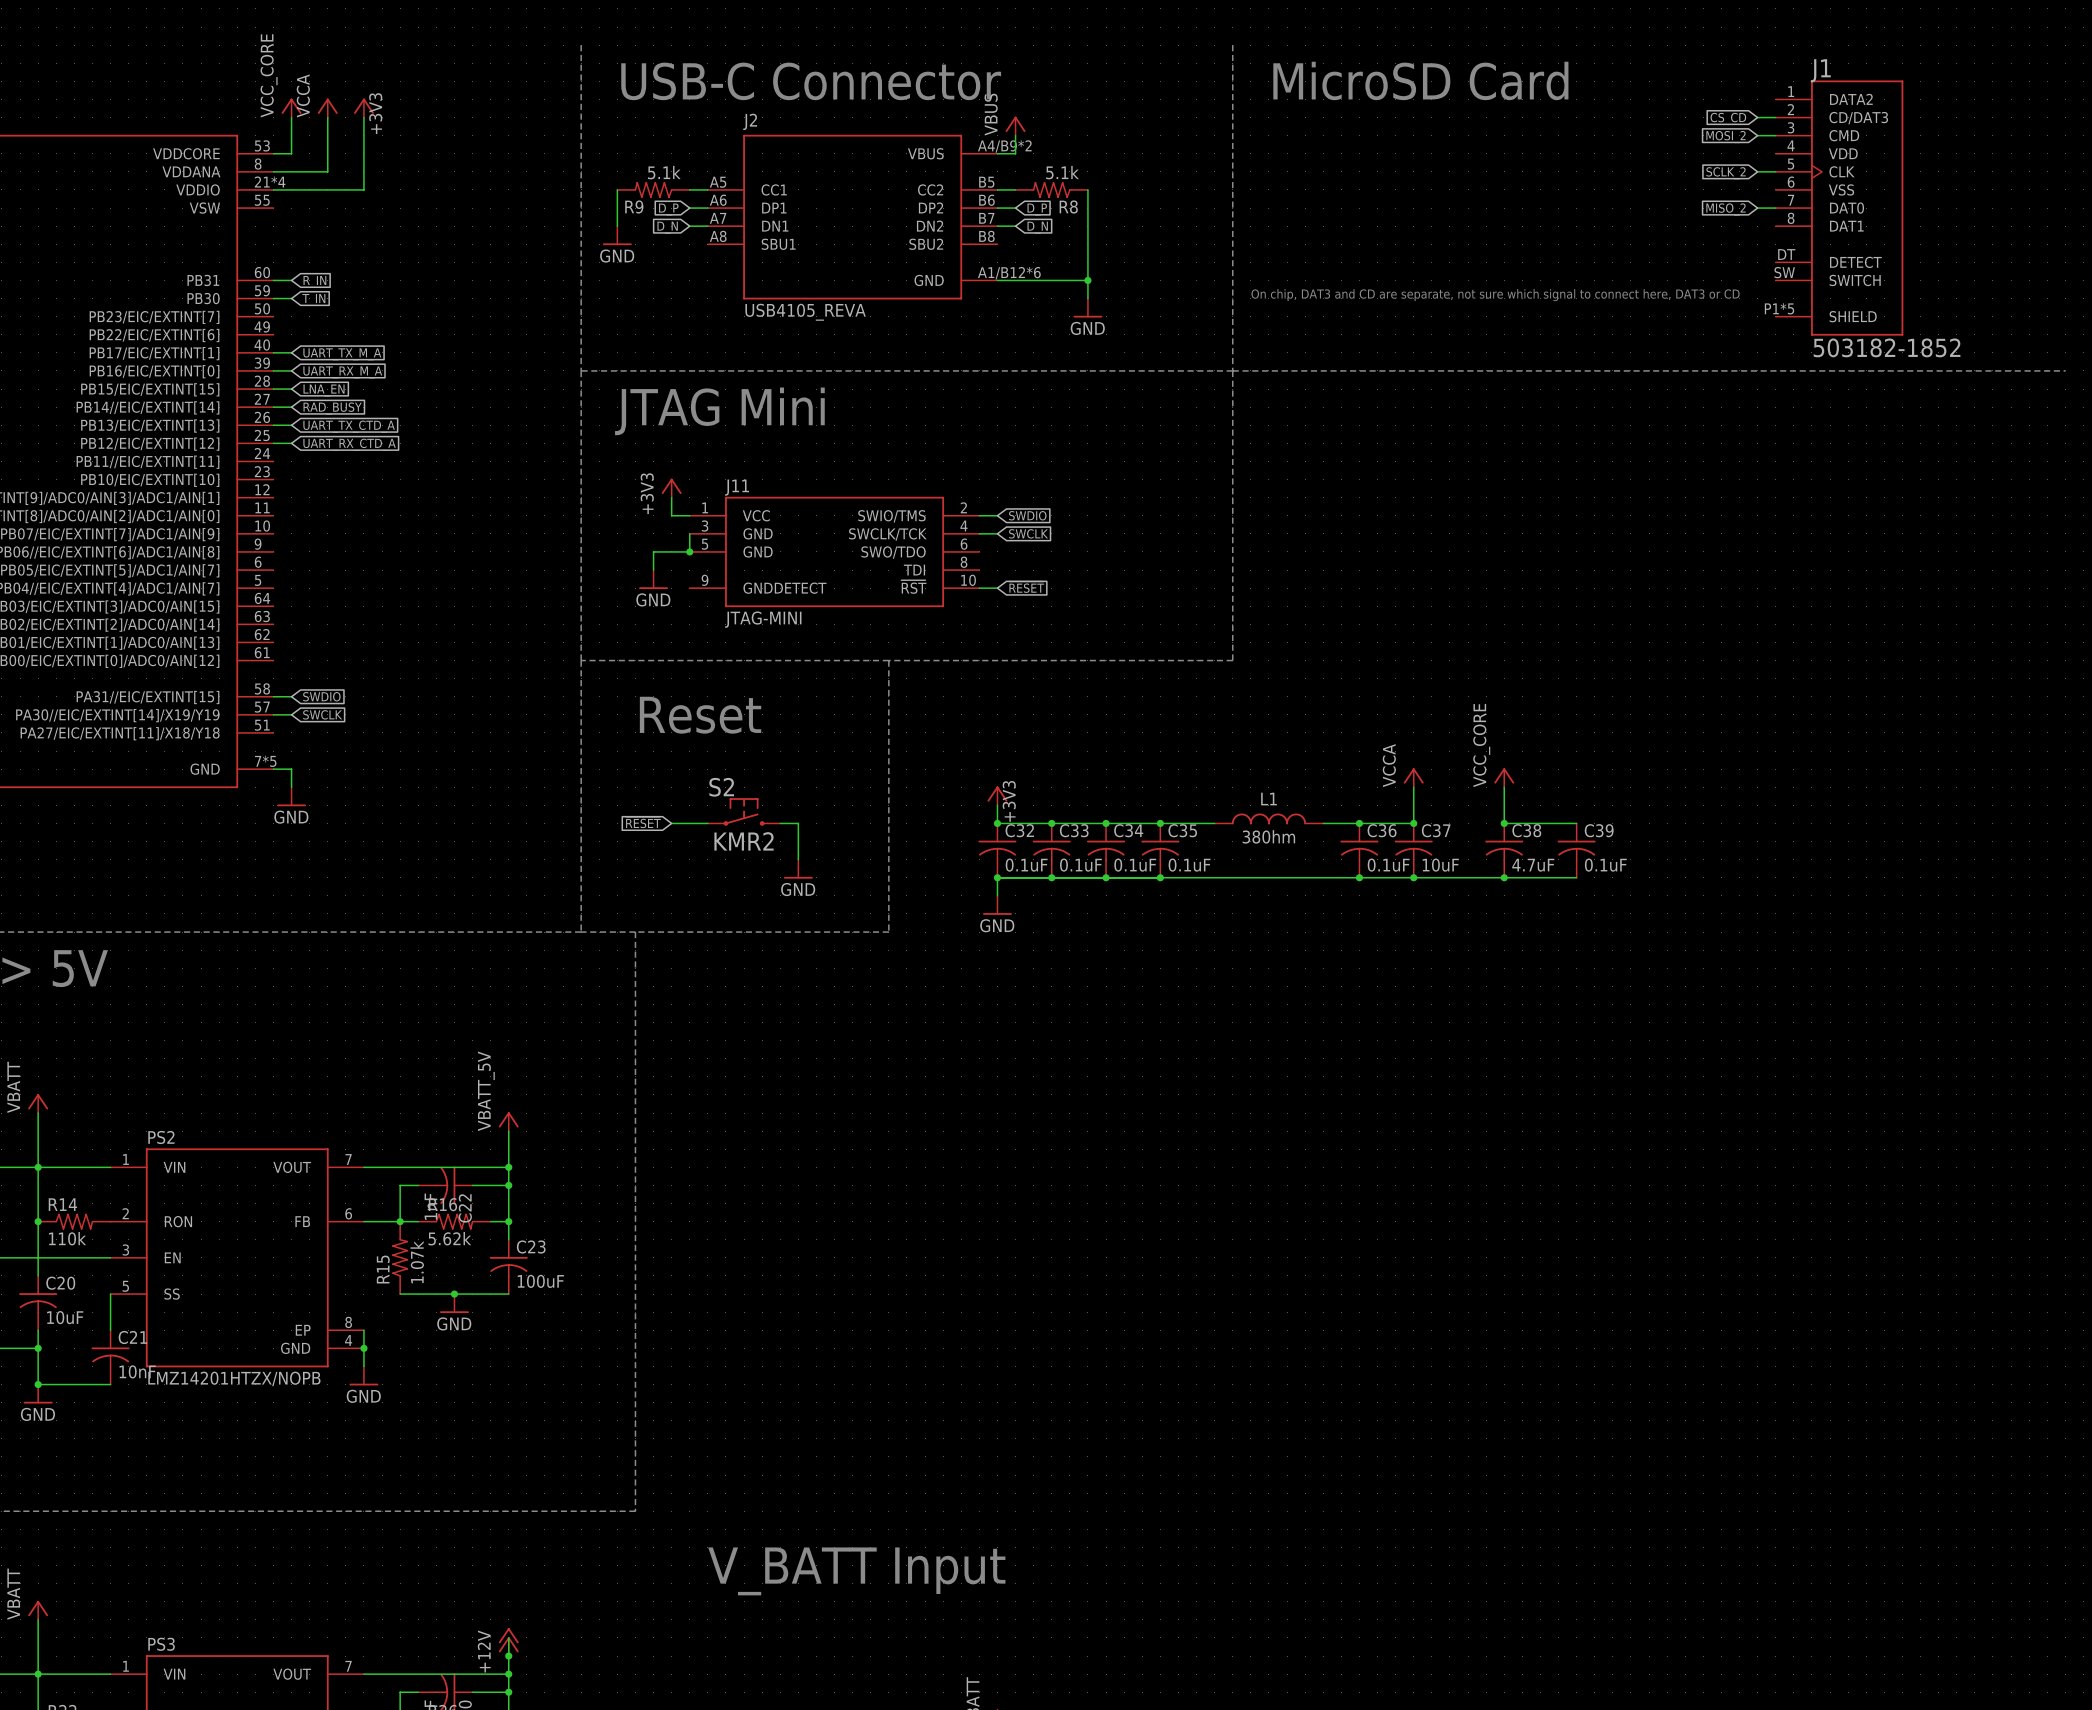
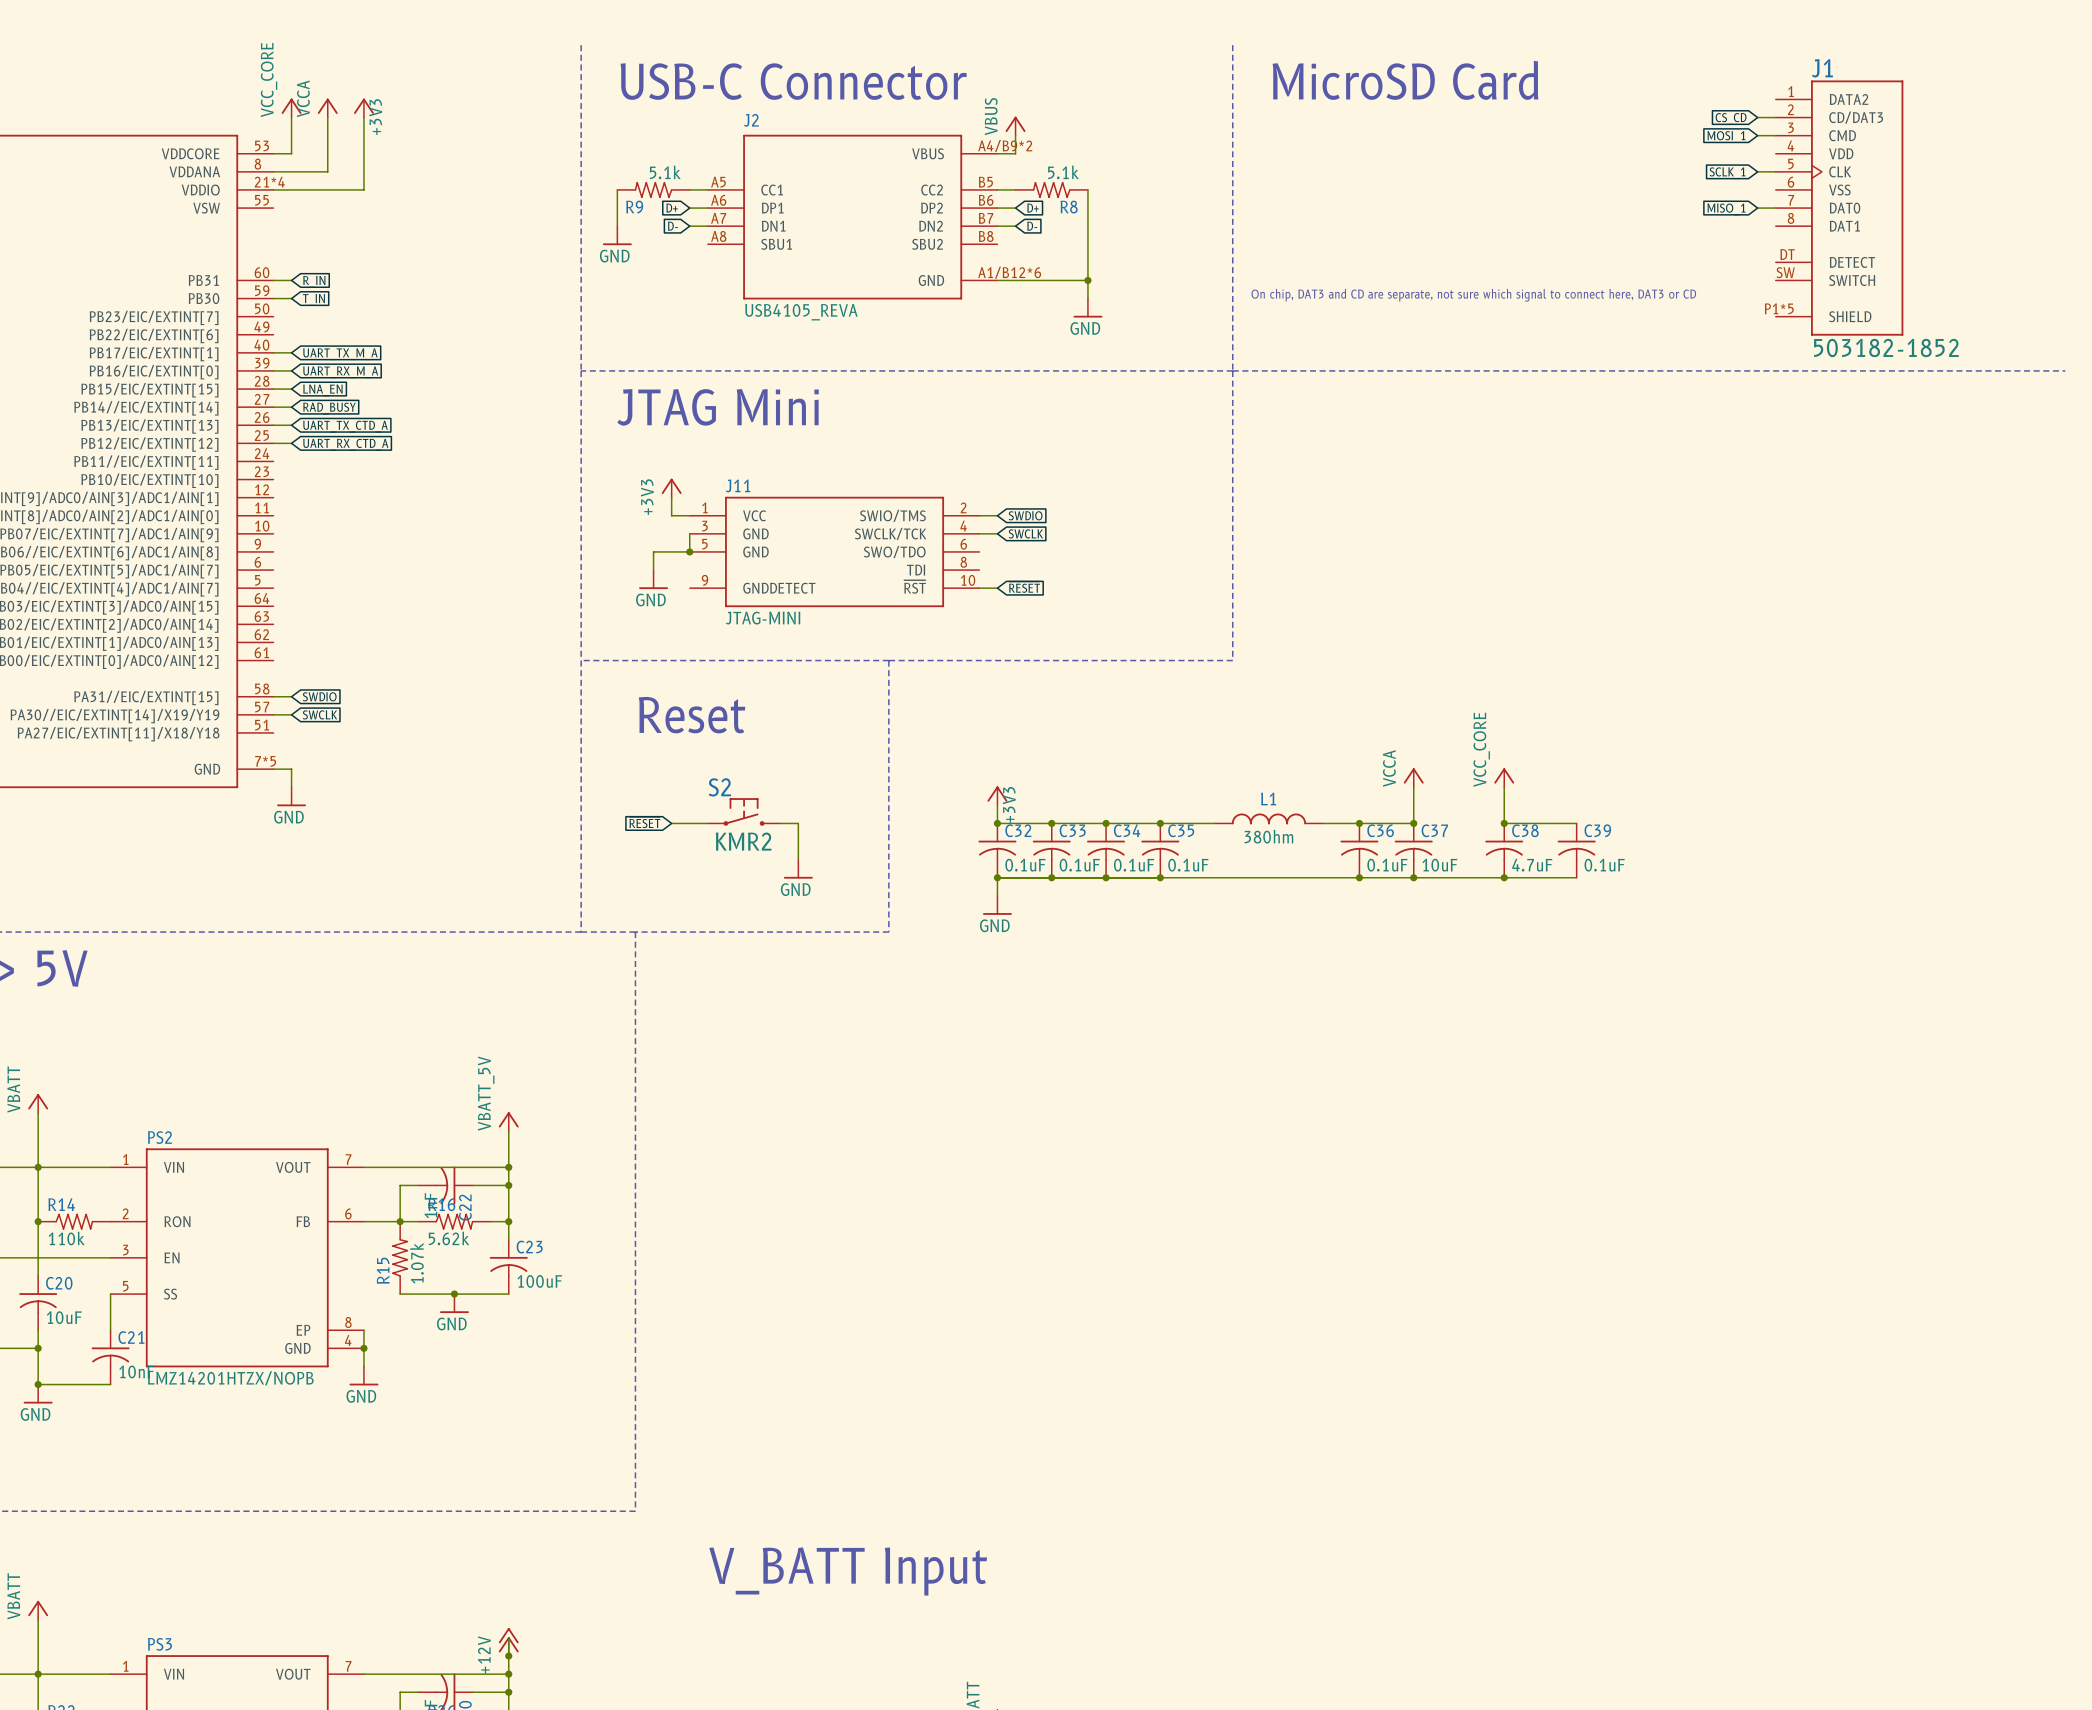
global label: MOSI_2 (1726, 137) -> MOSI_1 (1726, 137)
global label: SCLK_2 (1726, 173) -> SCLK_1 (1727, 173)
global label: D_P (668, 209) -> D+ (672, 208)
global label: D_P (1037, 209) -> D+ (1033, 208)
global label: MISO_2 (1726, 209) -> MISO_1 (1726, 209)
global label: D_N (667, 227) -> D- (672, 226)
global label: D_N (1037, 227) -> D- (1032, 226)

